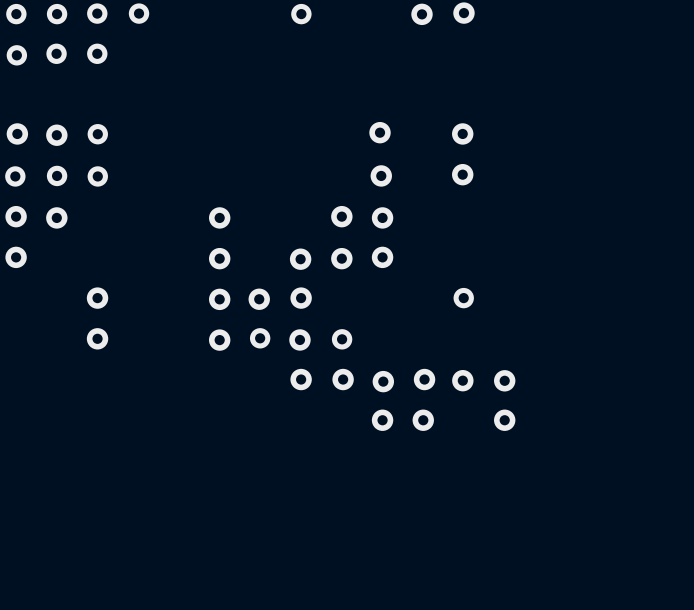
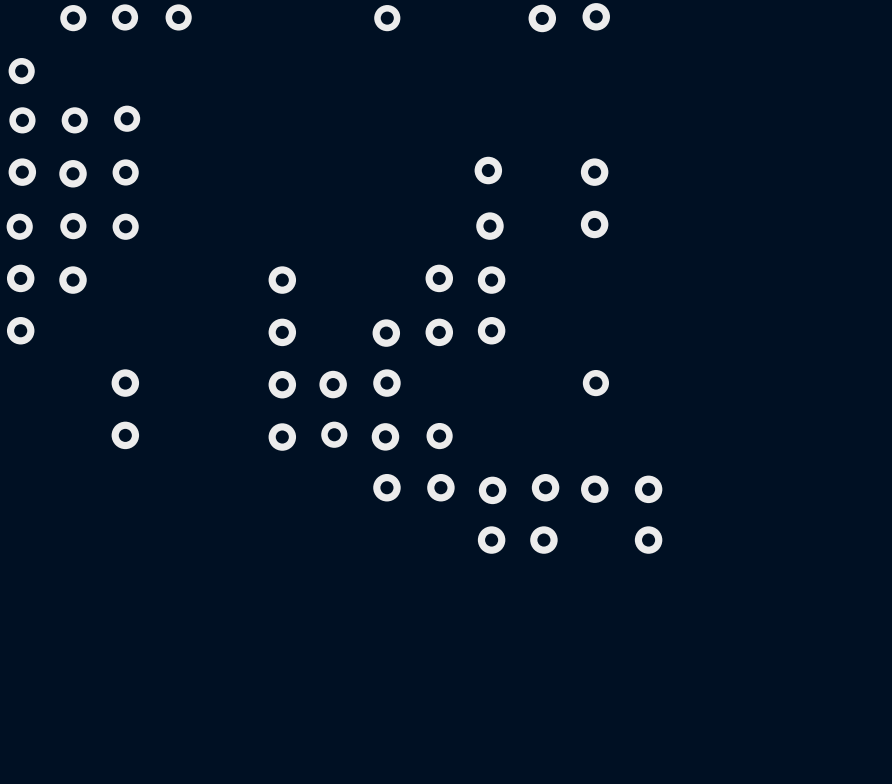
via: (16, 14) -> none
via: (56, 53) -> none
via: (97, 53) -> none
via: none -> (127, 118)
via: none -> (22, 120)
via: none -> (74, 120)

